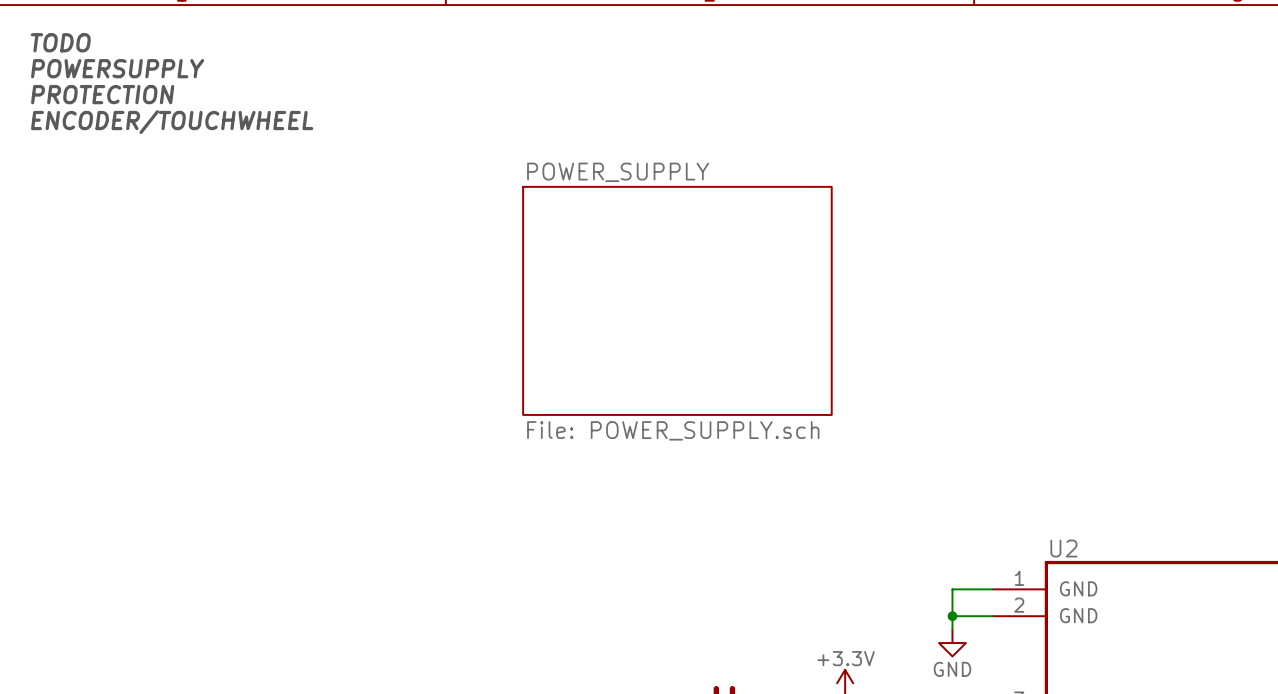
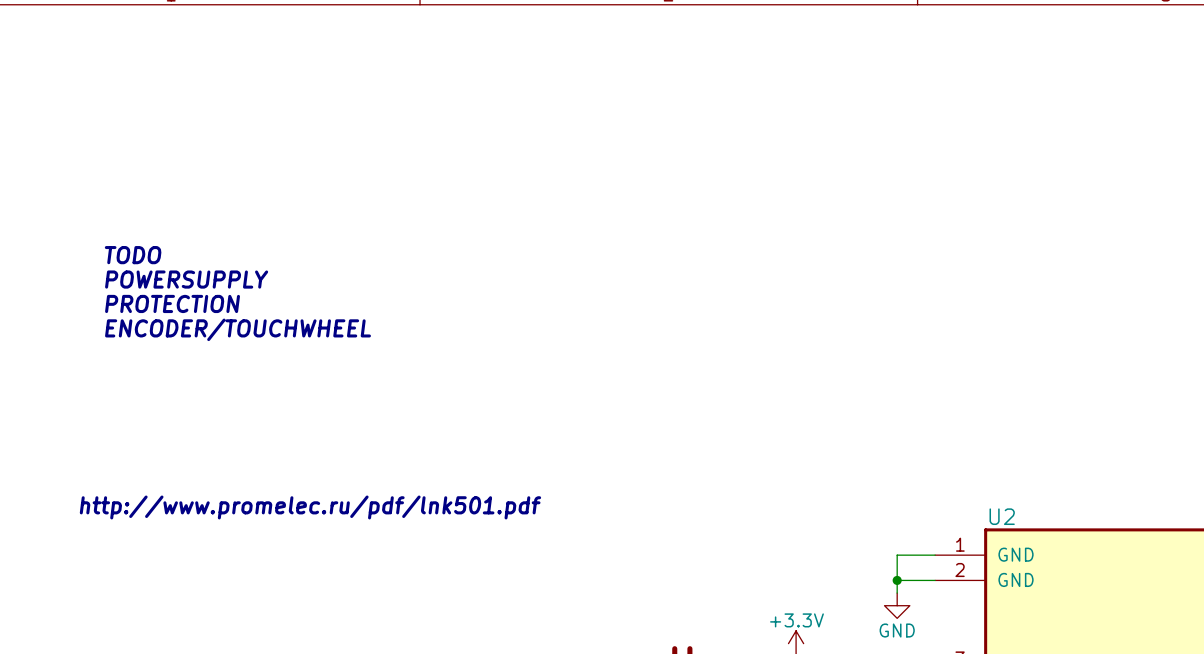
text position: TODO (60, 42) -> TODO (133, 255)
text position: POWERSUPPLY (117, 68) -> POWERSUPPLY (186, 279)
text position: PROTECTION (102, 94) -> PROTECTION (172, 303)
text position: ENCODER/TOUCHWHEEL (172, 122) -> ENCODER/TOUCHWHEEL (238, 329)
sheet POWER_SUPPLY: File: POWER_SUPPLY.sch (677, 300) -> none
text: none -> http://www.promelec.ru/pdf/lnk501.pdf (310, 507)

